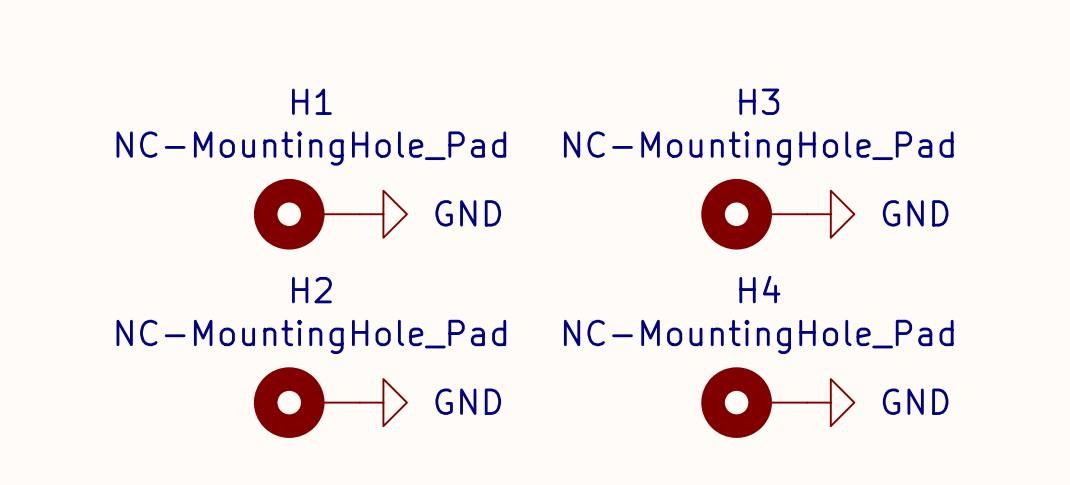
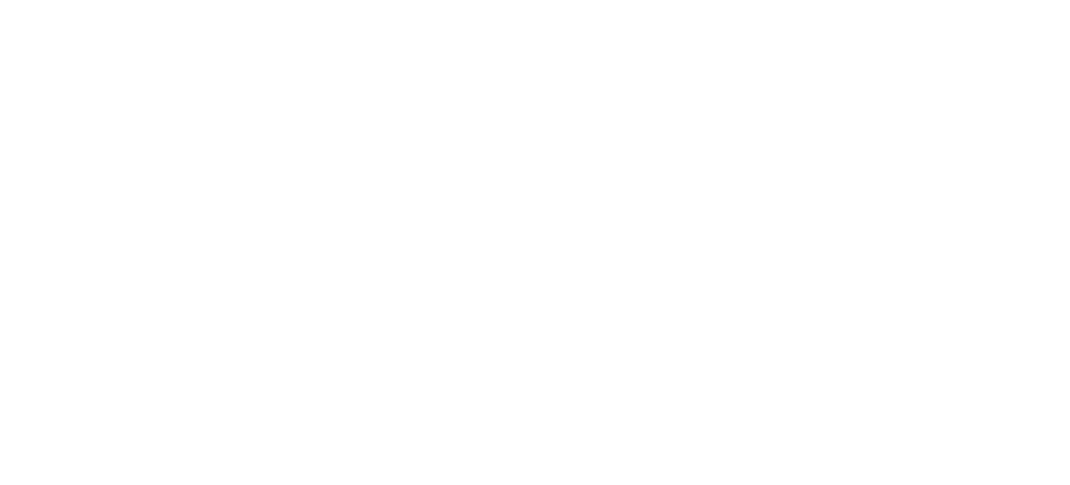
H1: NC-MountingHole_Pad (306, 214) -> none
power symbol: GND (383, 214) -> none
H3: NC-MountingHole_Pad (754, 214) -> none
power symbol: GND (830, 214) -> none
H2: NC-MountingHole_Pad (306, 402) -> none
power symbol: GND (383, 402) -> none
H4: NC-MountingHole_Pad (754, 402) -> none
power symbol: GND (830, 402) -> none

